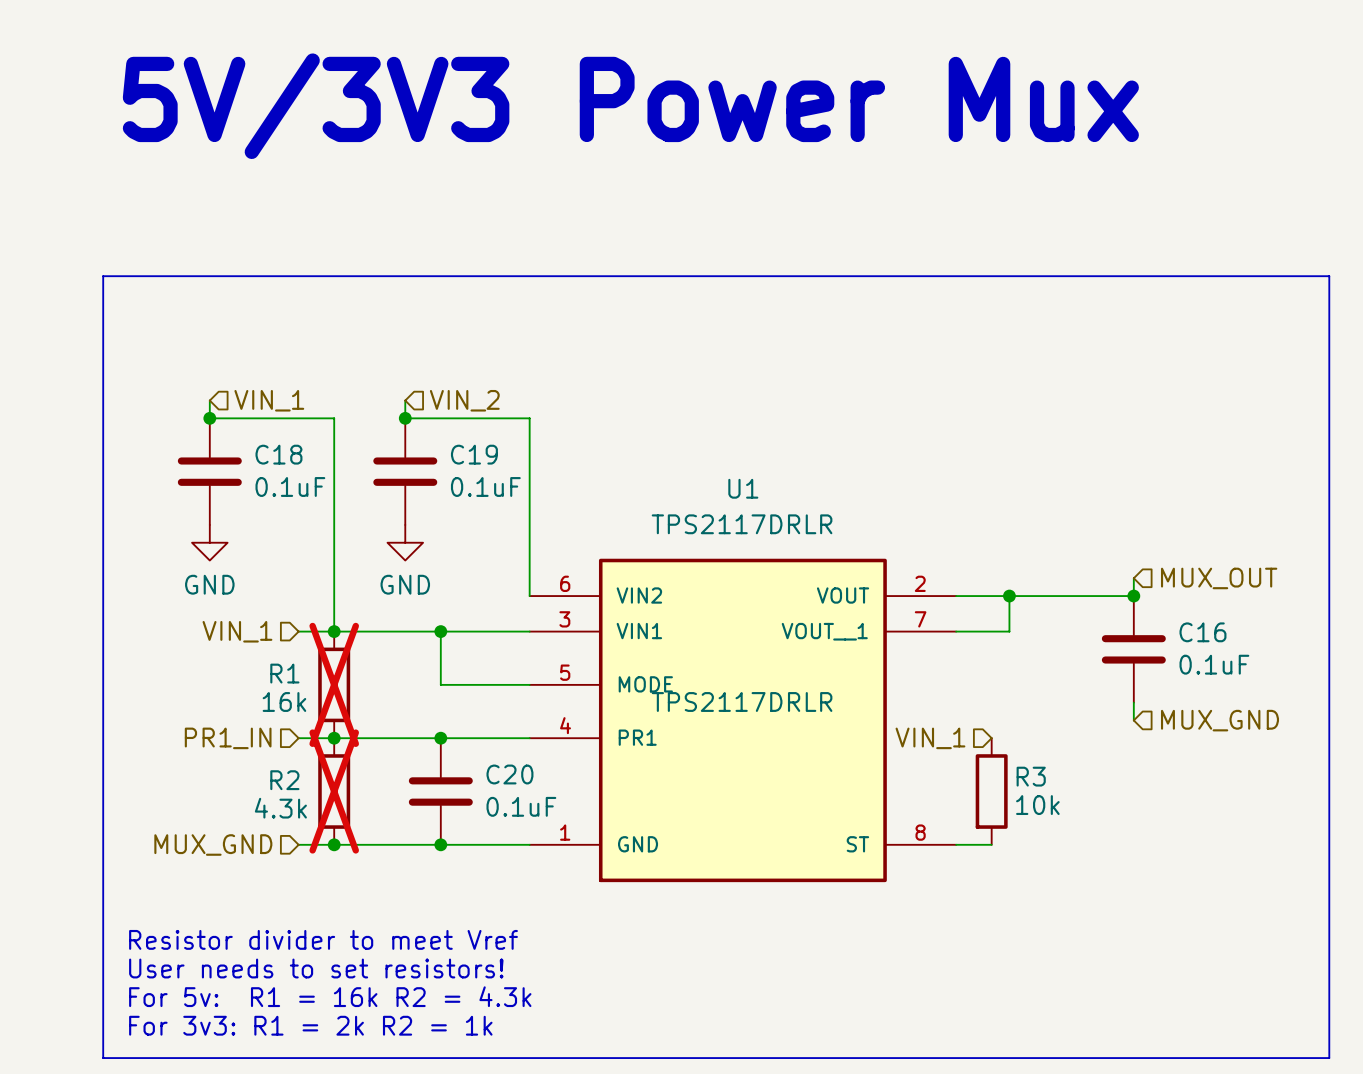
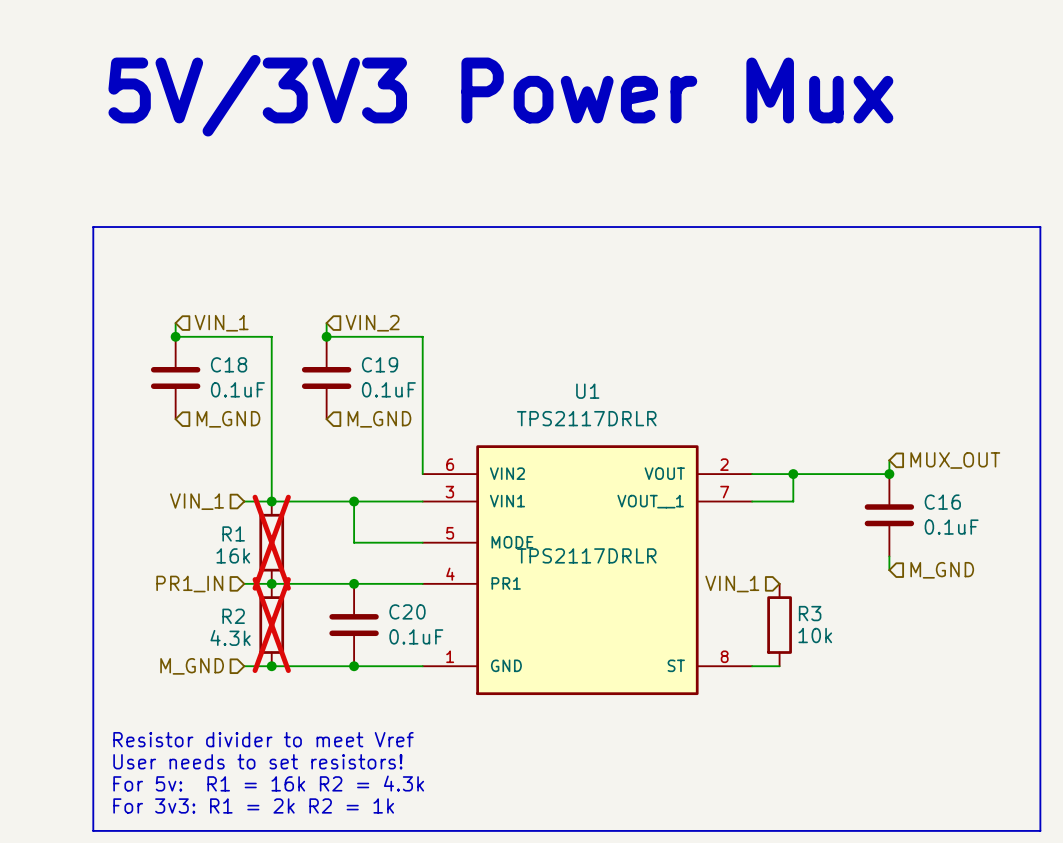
hierarchical label: none -> M_GND (228, 419)
hierarchical label: none -> M_GND (379, 419)
power symbol: GND (209, 542) -> none
power symbol: GND (405, 542) -> none
hierarchical label: MUX_GND (1219, 720) -> M_GND (942, 570)
hierarchical label: MUX_GND (213, 845) -> M_GND (192, 666)

